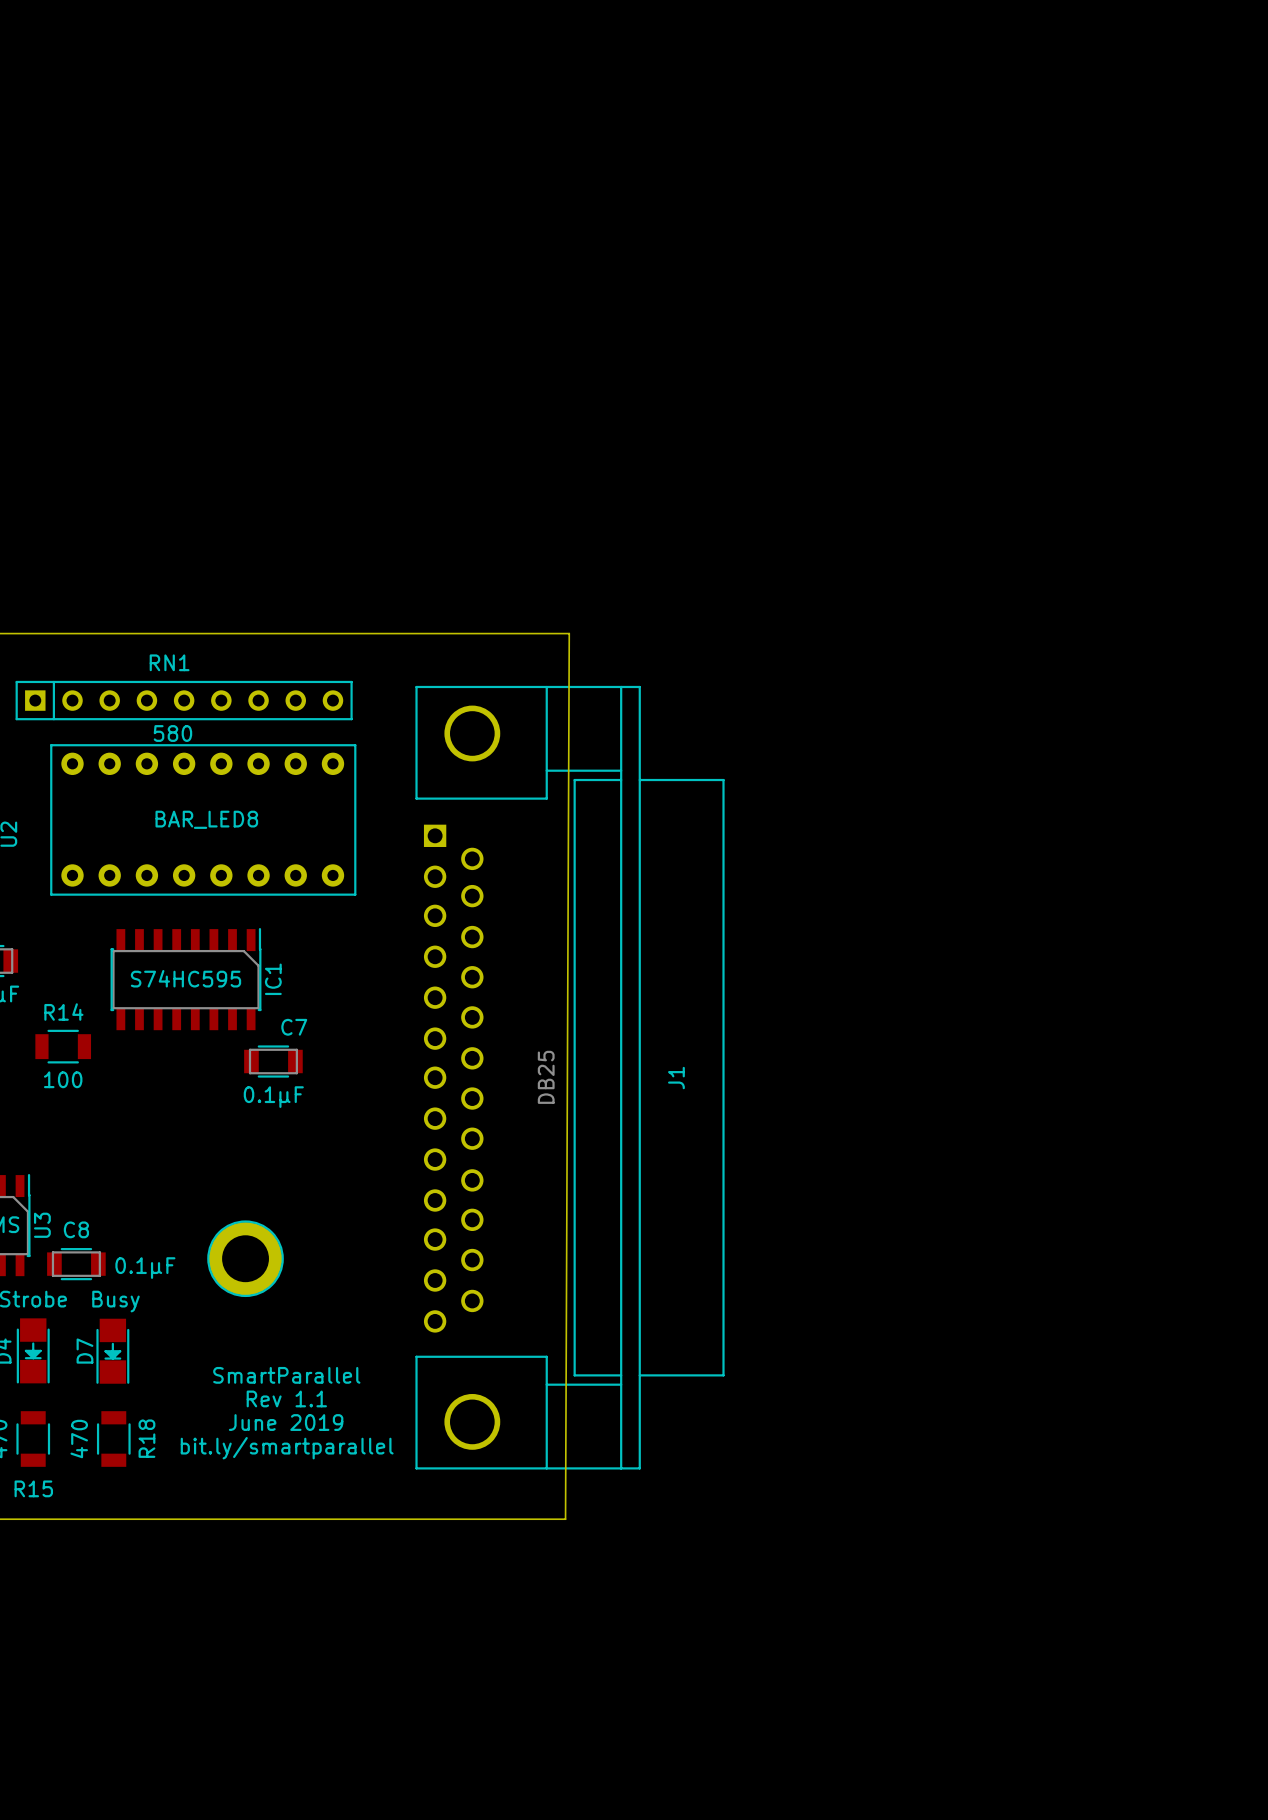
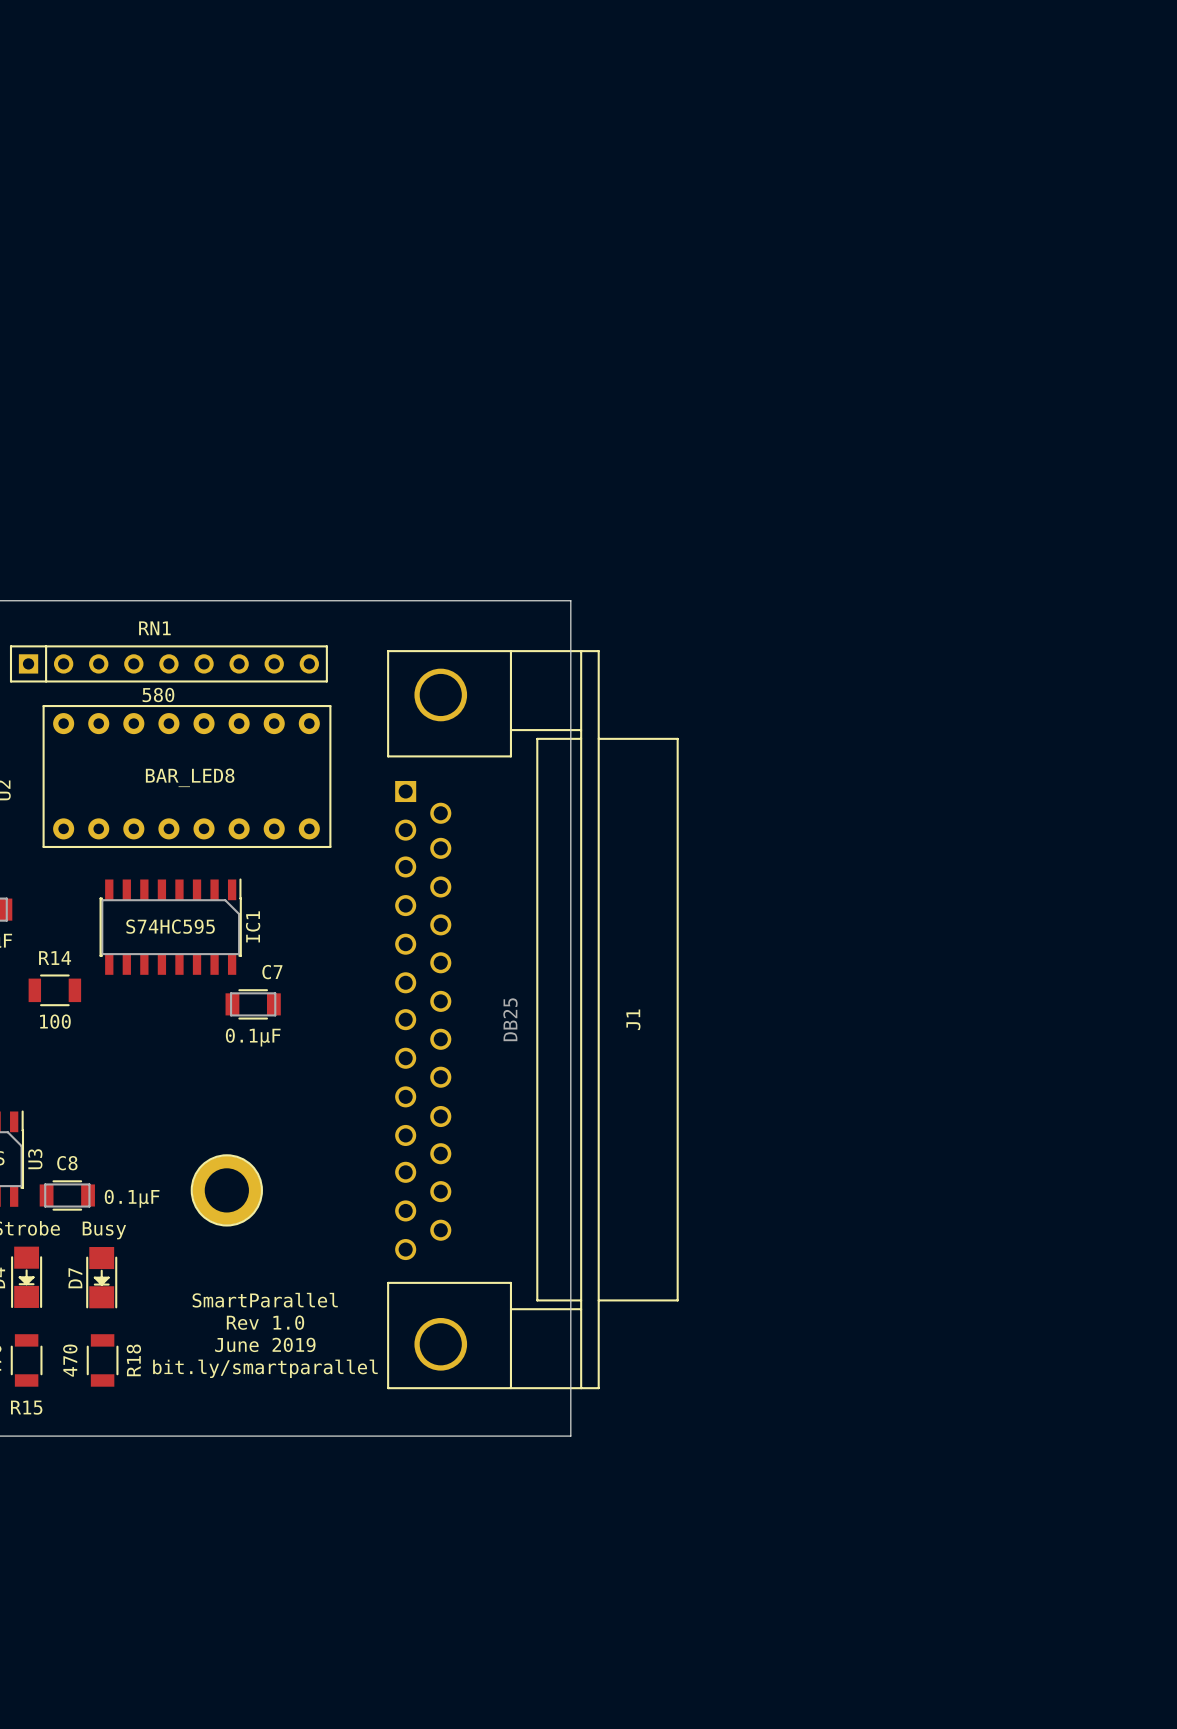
board edge: (569, 633) (565, 1519) -> (532, 600) (570, 600) (570, 1436) (528, 1436)
text: Rev 1.1 (286, 1398) -> Rev 1.0 (265, 1322)

